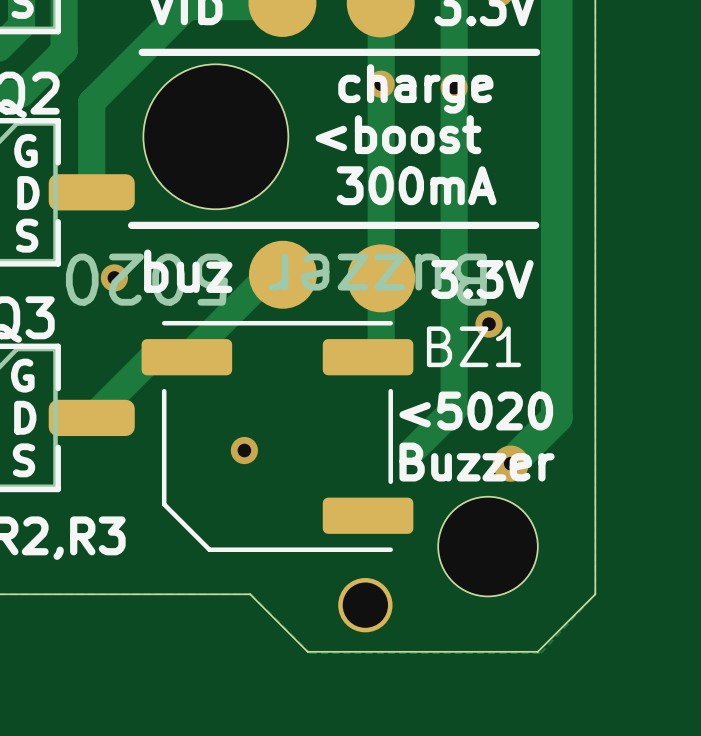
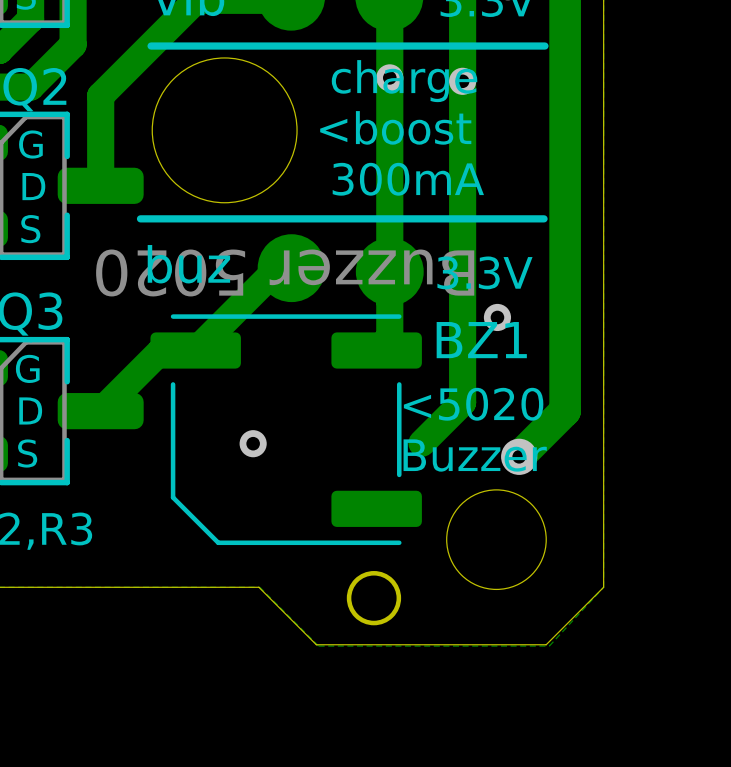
via: (114, 277) -> none

